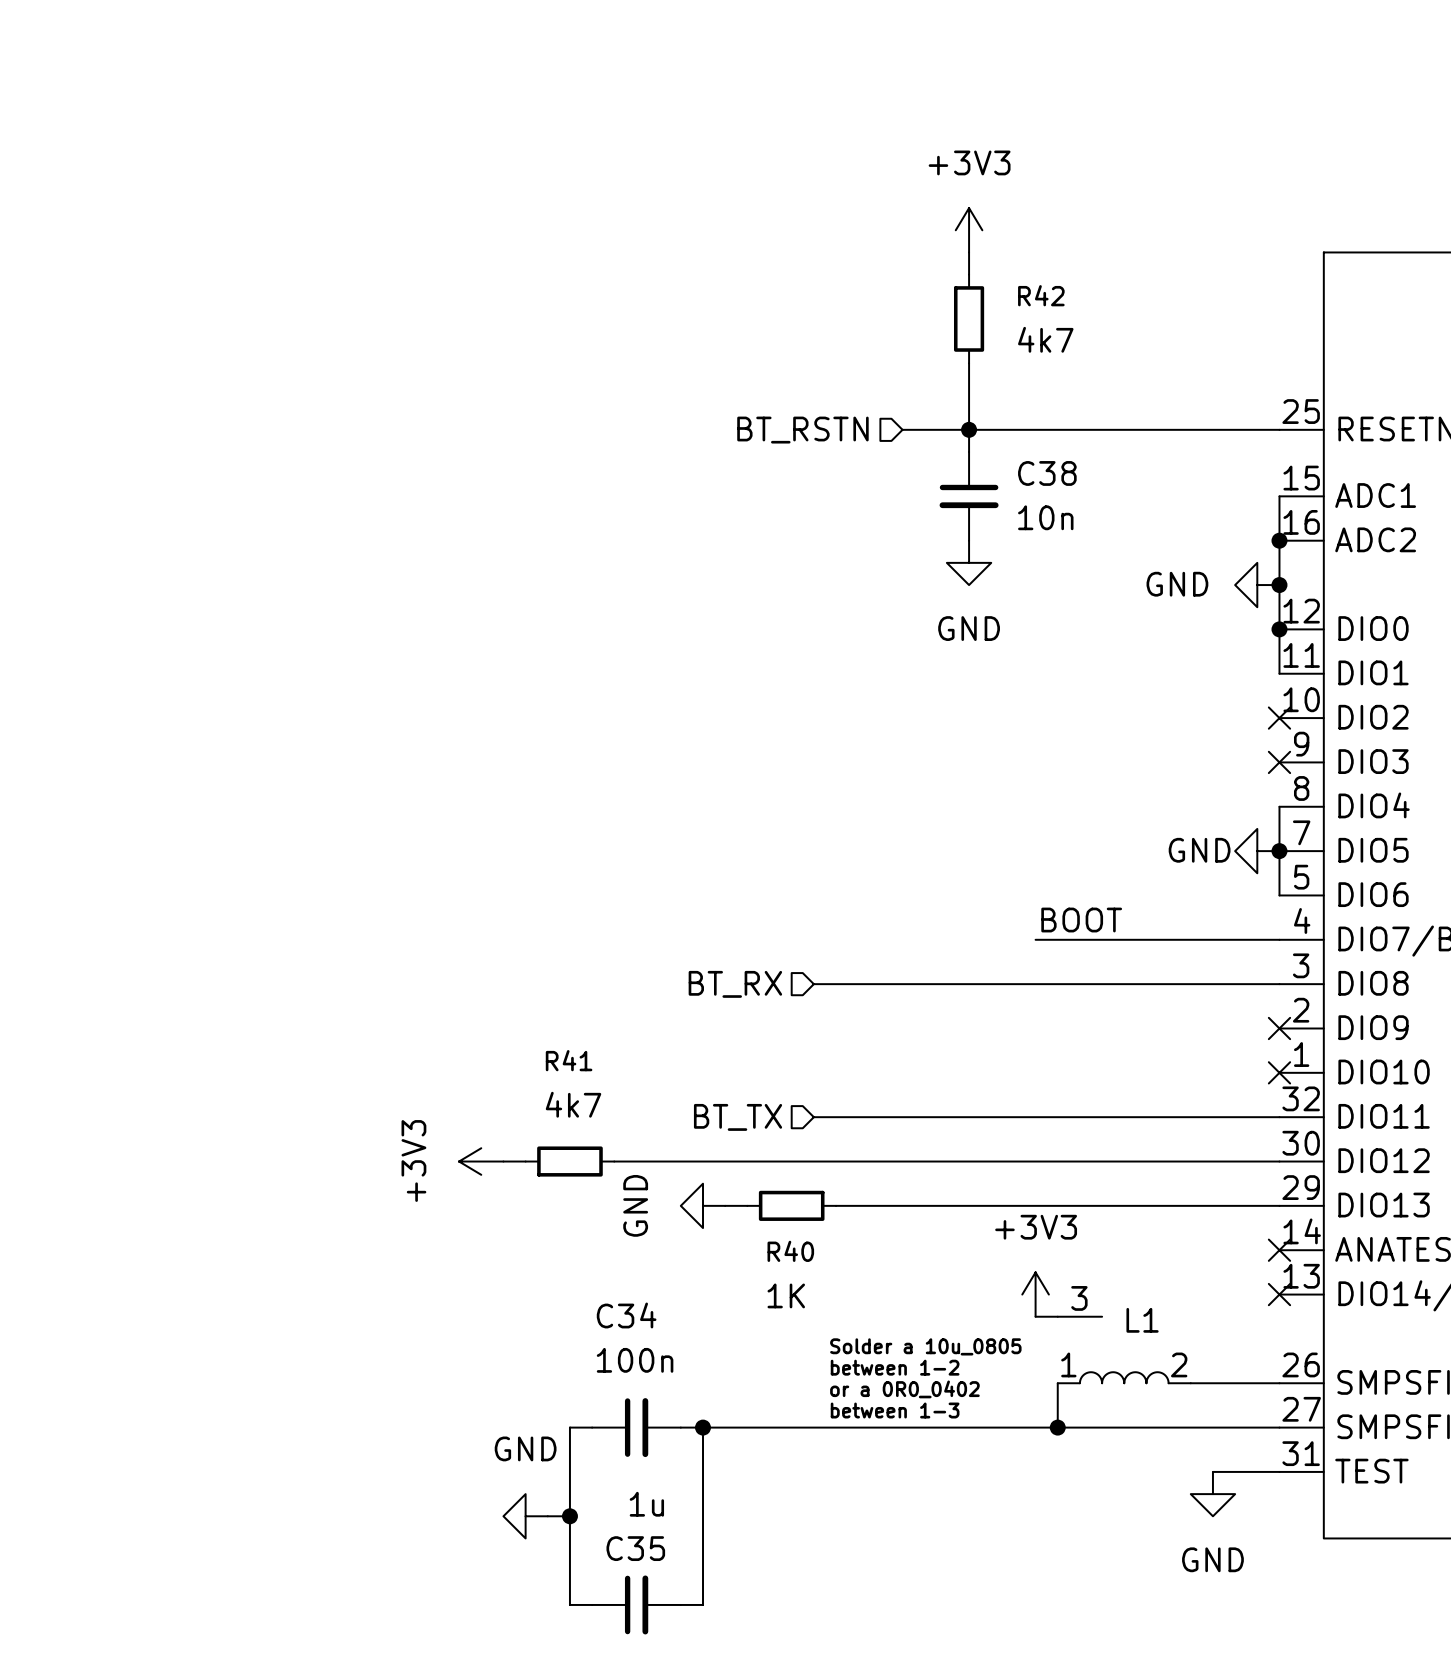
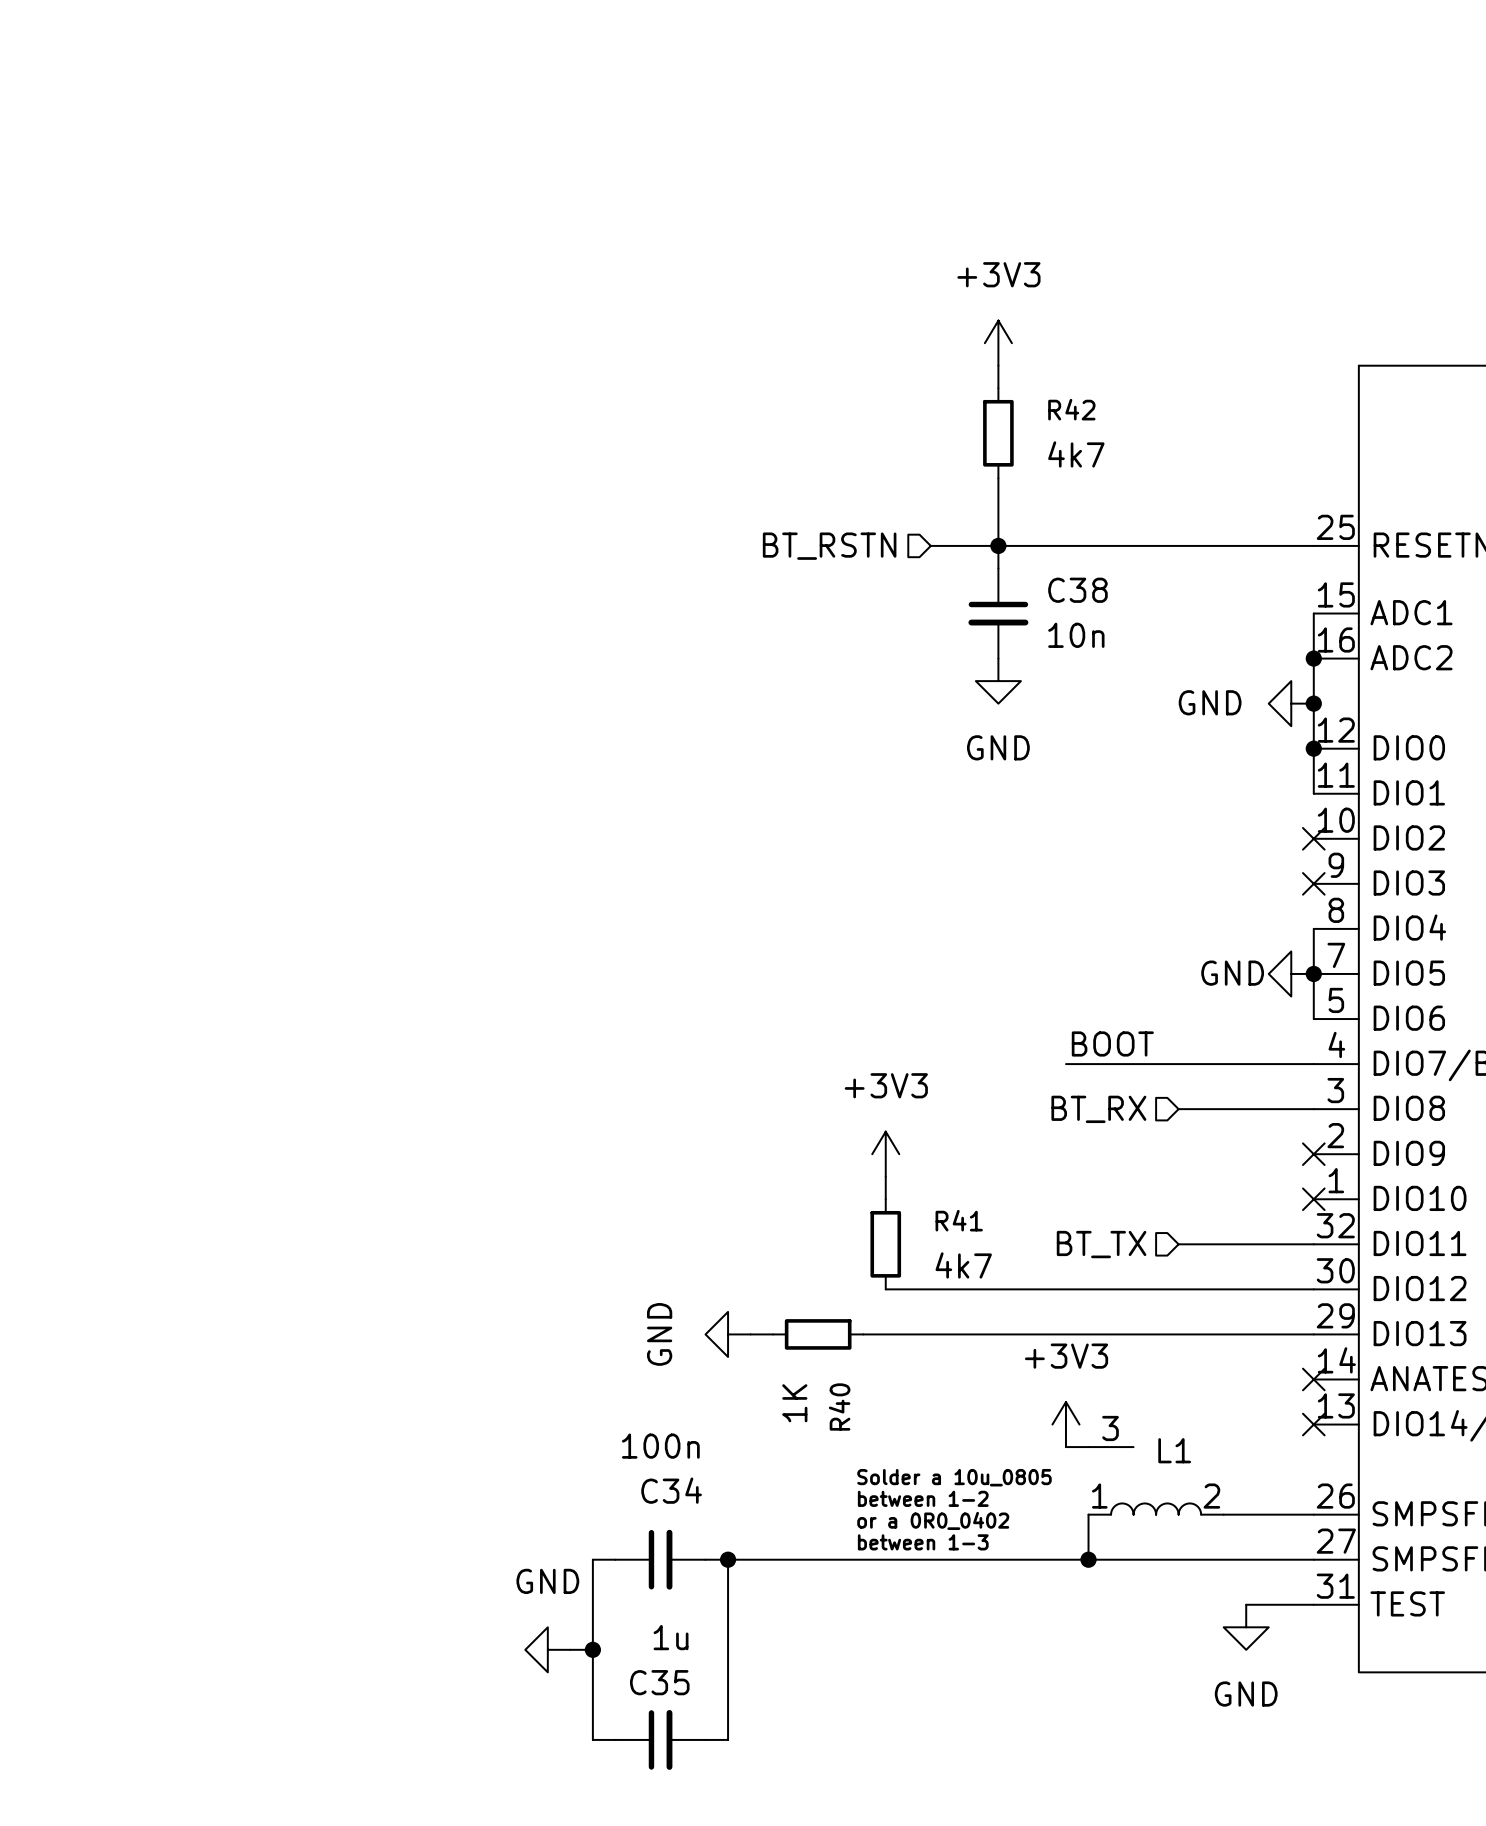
hierarchical label position: BT_RX (735, 984) -> BT_RX (1098, 1109)
wire: (813, 984) (1146, 984) -> none
wire: none -> (885, 1176) (885, 1199)
hierarchical label position: BT_TX (738, 1117) -> BT_TX (1101, 1244)
wire: (813, 1117) (1146, 1117) -> none
power symbol rotation: 0° (481, 1161) -> 90° clockwise (885, 1154)
power symbol position: +3V3 (481, 1161) -> +3V3 (885, 1154)
wire: (503, 1161) (525, 1161) -> none
R41 rotation: 0° (569, 1161) -> 90° clockwise (885, 1244)
R41 position: (569, 1161) -> (885, 1244)
wire: (614, 1161) (858, 1161) -> none
R40 name rotation: 0° (790, 1251) -> 90° counterclockwise (839, 1407)
R40 value rotation: 0° (786, 1295) -> 90° counterclockwise (794, 1403)
C34 name position: C34 (626, 1315) -> C34 (671, 1490)
C34 value position: 100n (635, 1360) -> 100n (660, 1446)

